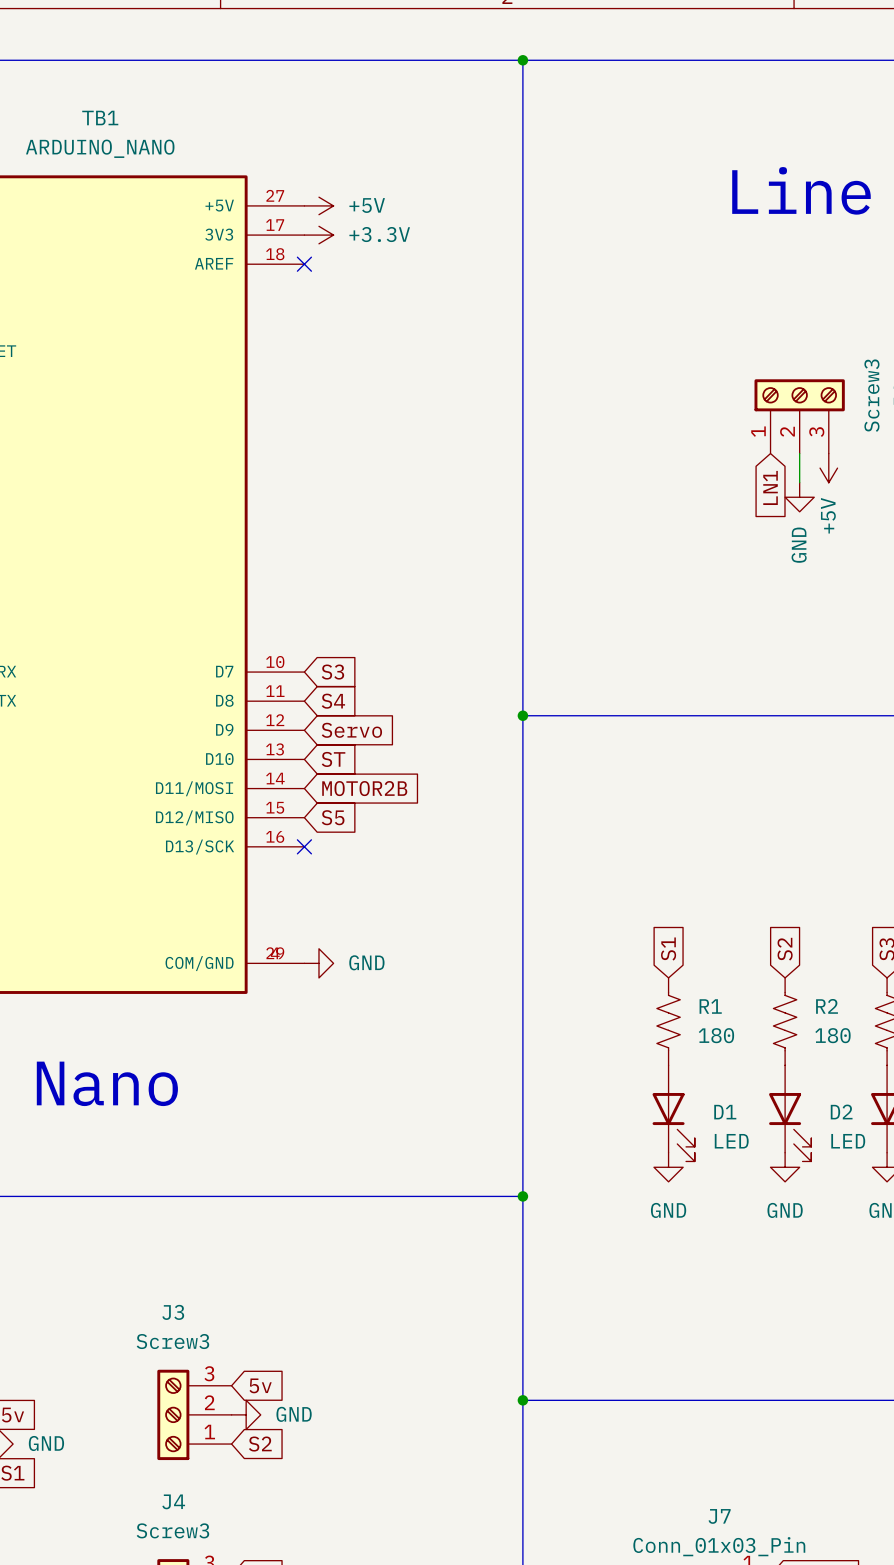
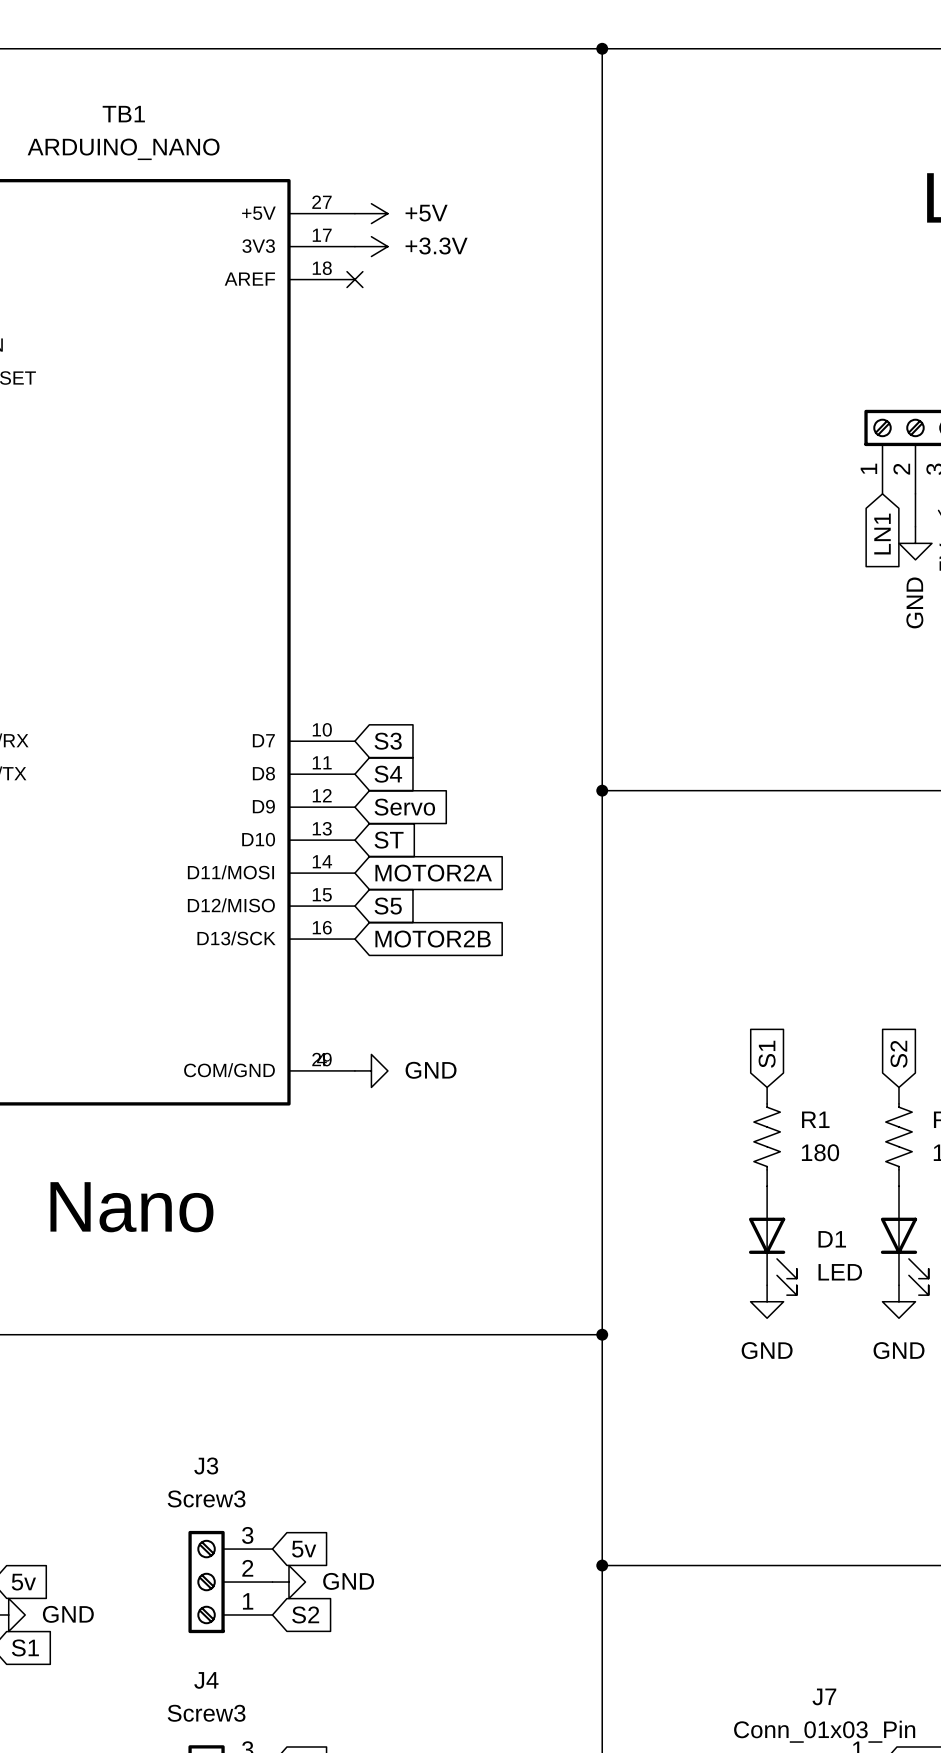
global label: MOTOR2B (364, 788) -> MOTOR2A (433, 873)
no-connect mark: (304, 846) -> none
global label: none -> MOTOR2B (433, 939)

